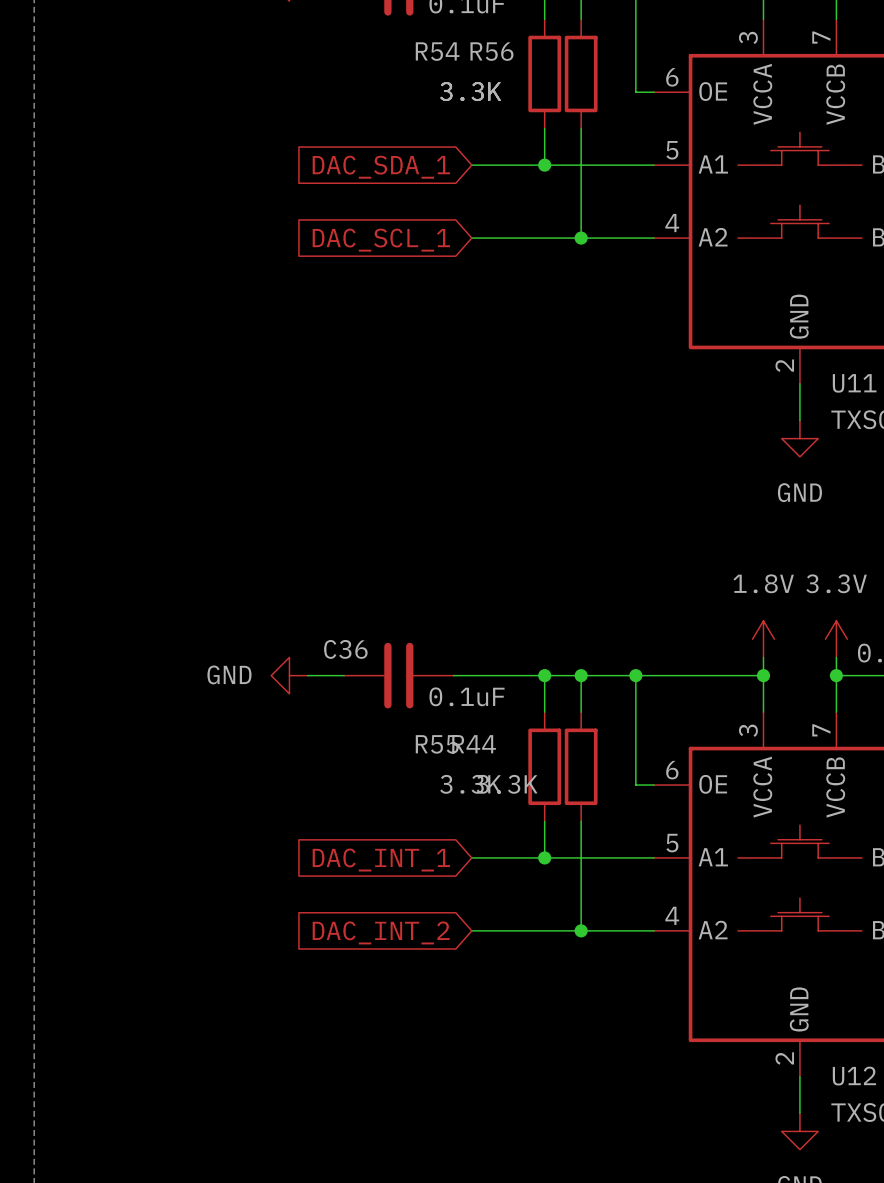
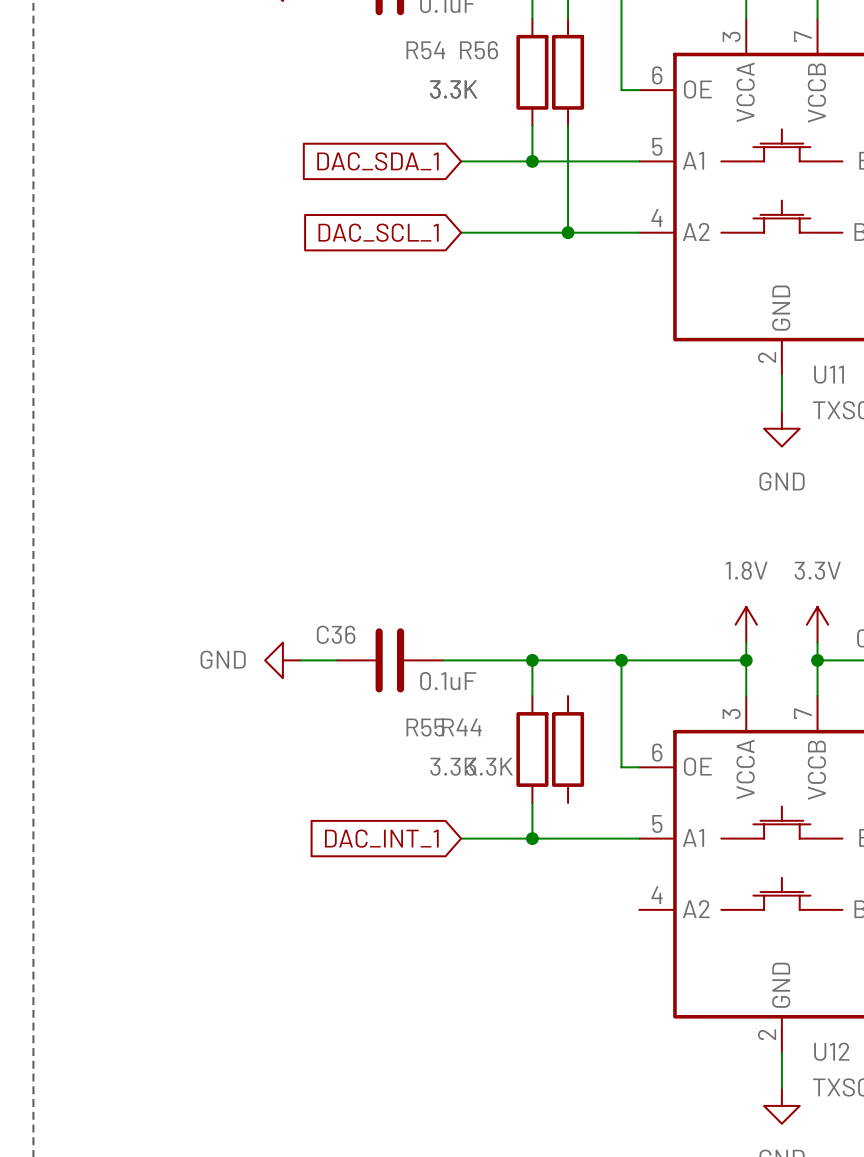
wire: (581, 675) (581, 712) -> none
junction: (581, 675) -> none
wire: (581, 821) (581, 930) -> none
wire: (471, 930) (654, 930) -> none
junction: (581, 930) -> none
global label: DAC_INT_2 (381, 932) -> none

